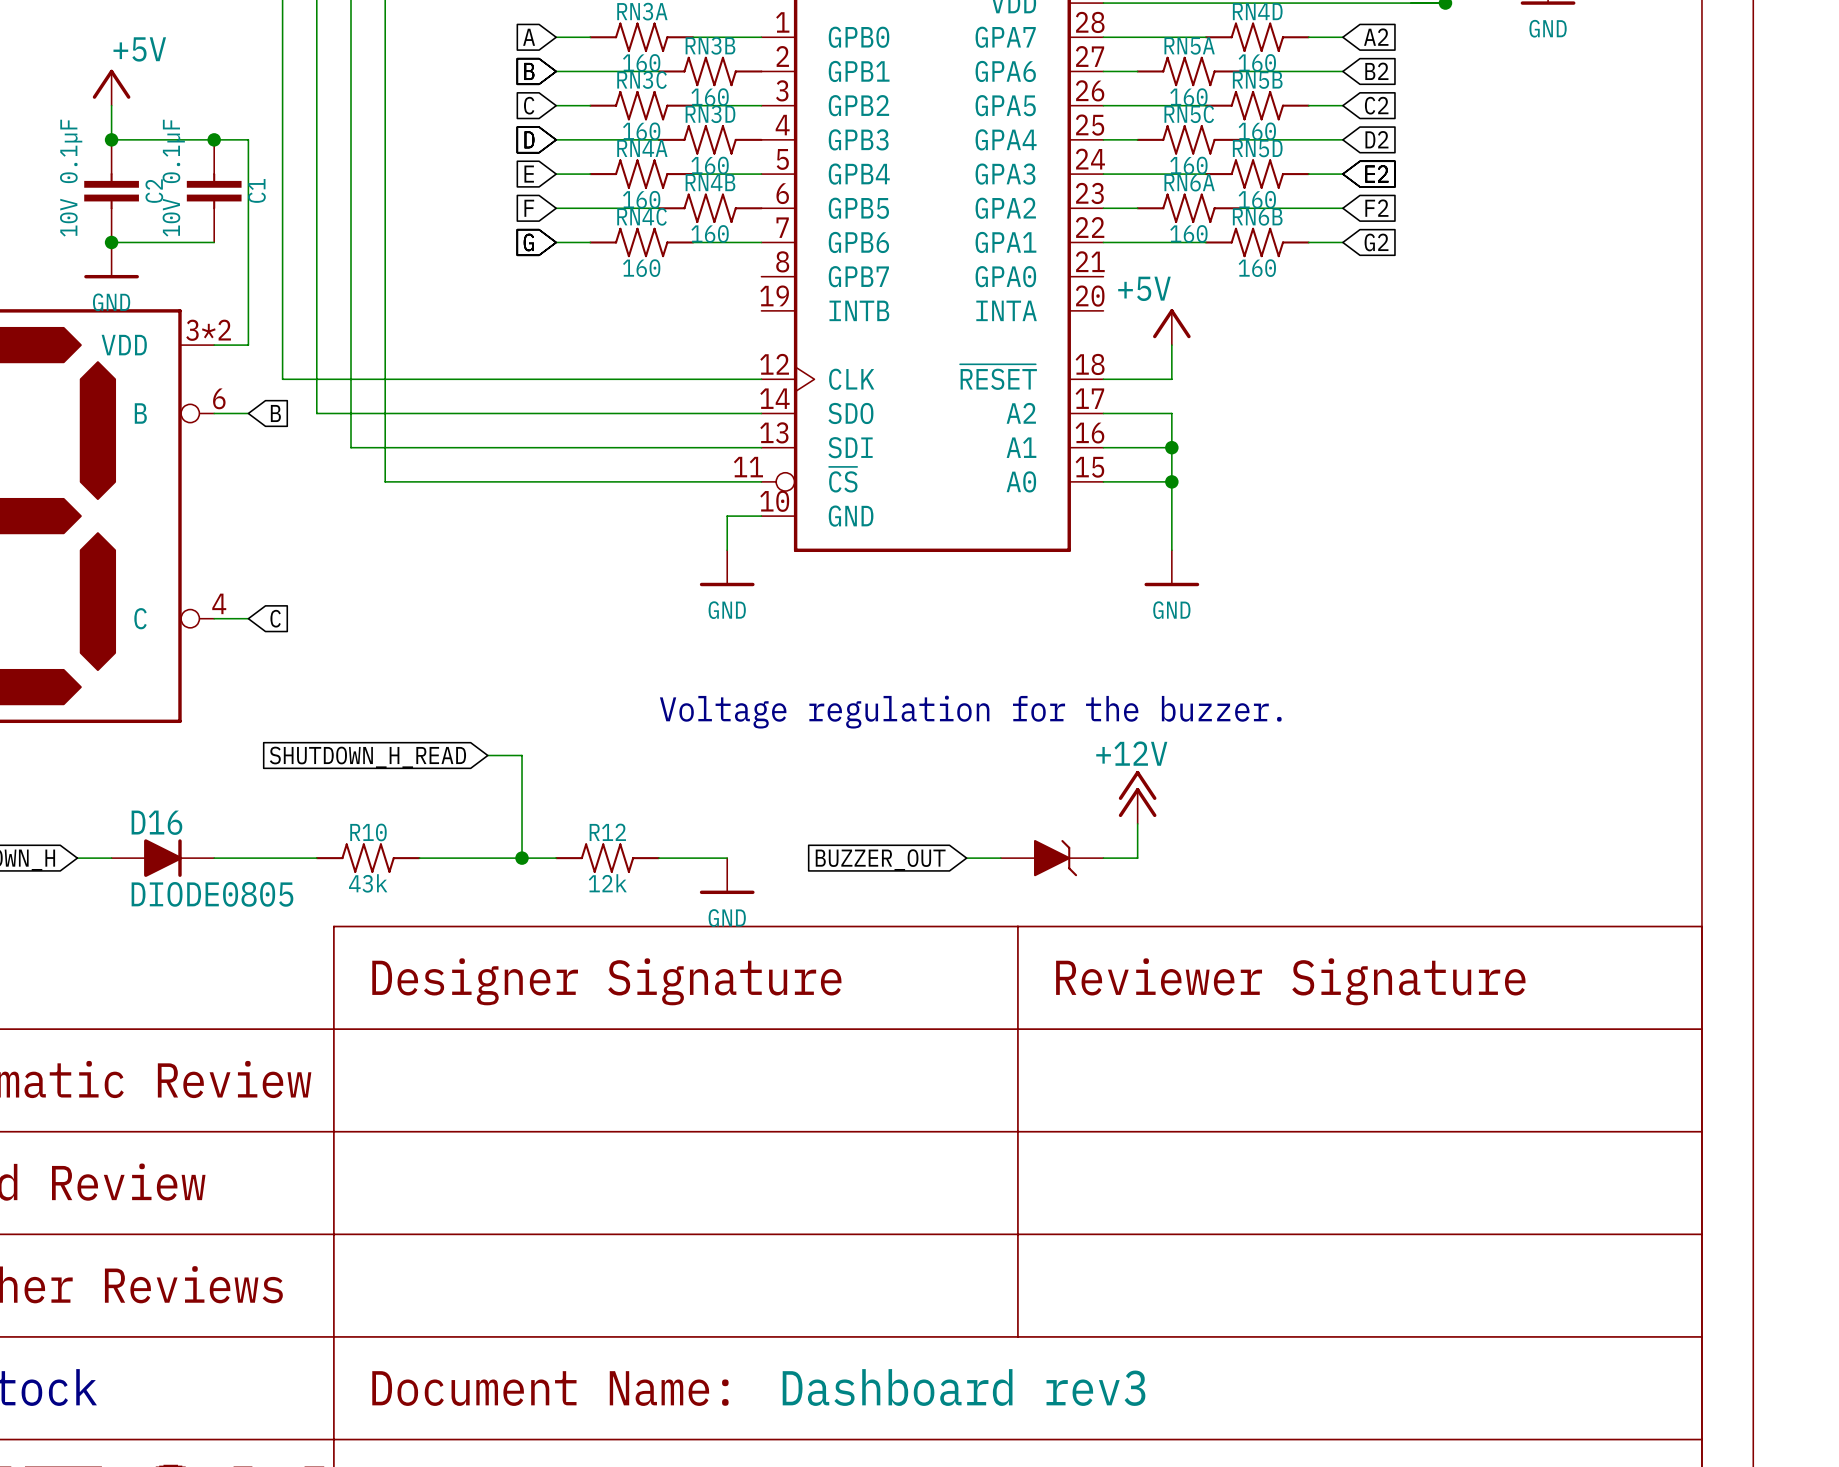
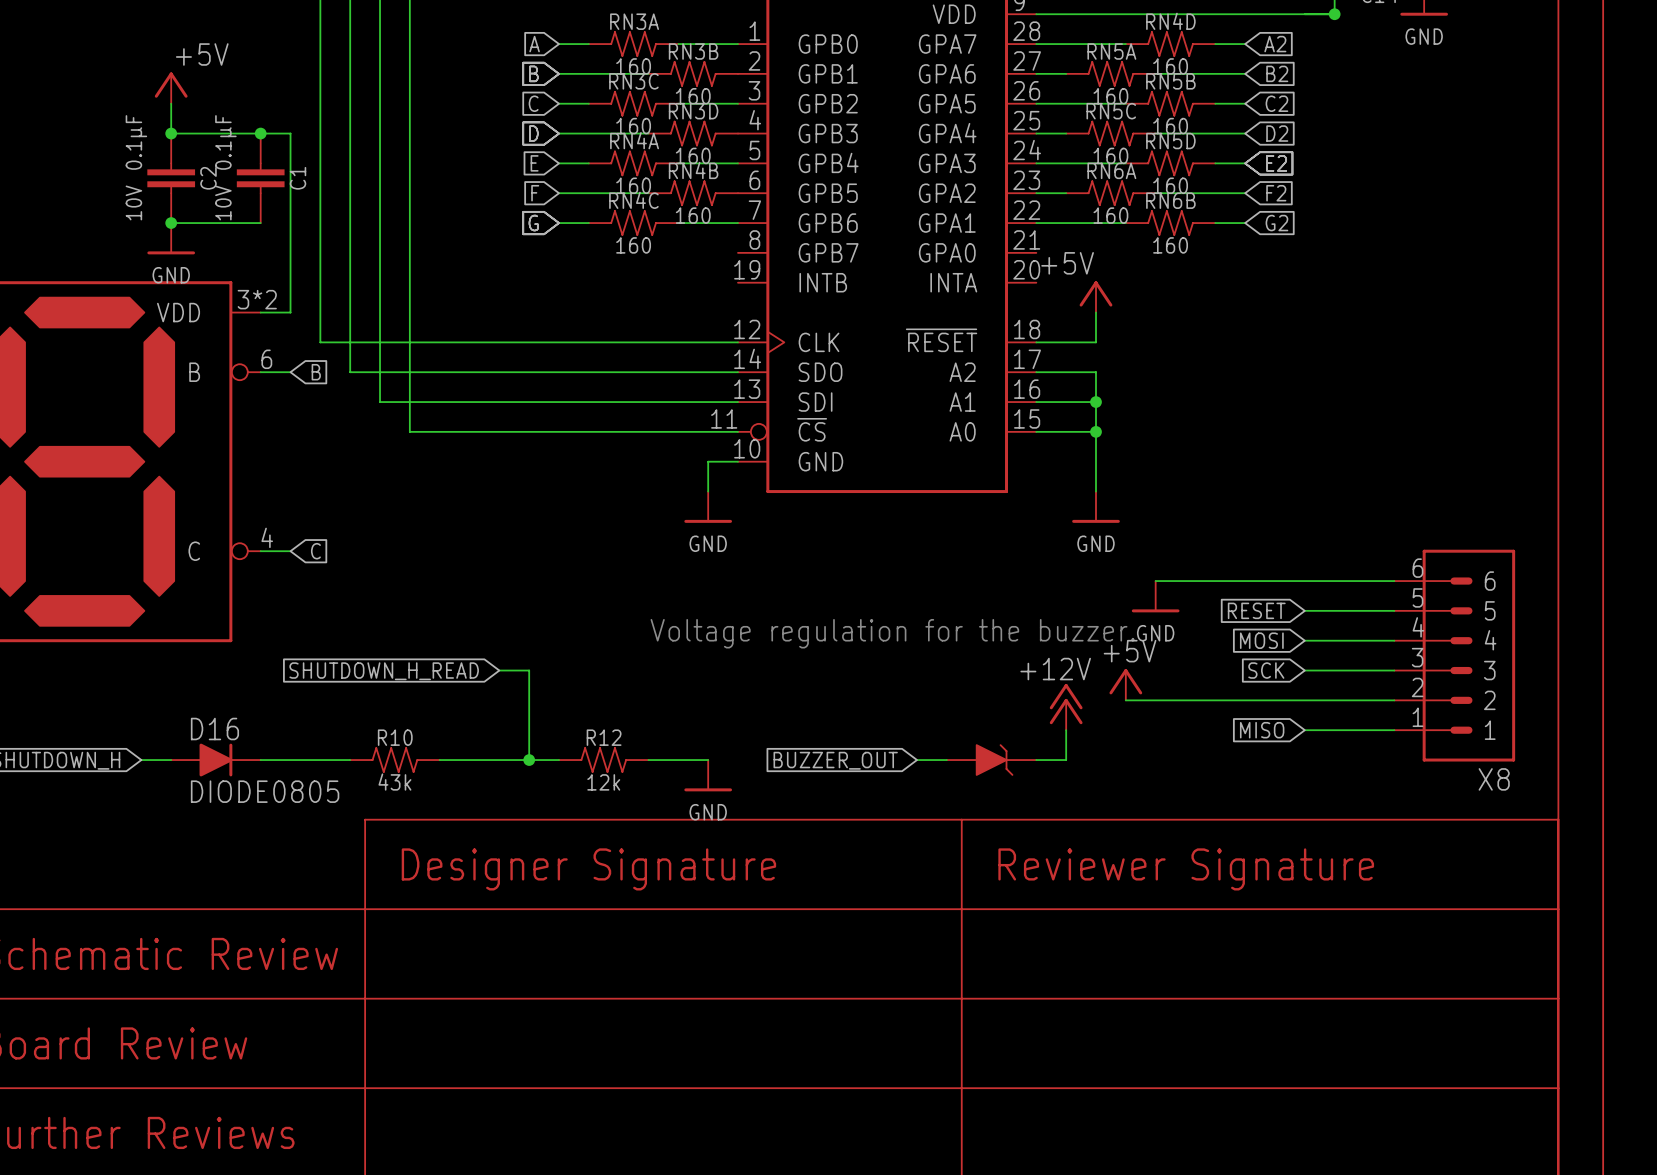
wire: none -> (1155, 581) (1394, 581)
power symbol: none -> GND (1155, 596)
global label: none -> RESET (1256, 610)
wire: none -> (1304, 610) (1394, 610)
global label: none -> MOSI (1261, 640)
wire: none -> (1304, 640) (1394, 640)
X8: none -> (1454, 655)
global label: none -> SCK (1266, 670)
wire: none -> (1304, 670) (1394, 670)
power symbol: none -> +5V (1125, 684)
wire: none -> (1125, 700) (1394, 700)
global label: none -> MISO (1262, 730)
wire: none -> (1304, 730) (1394, 730)

